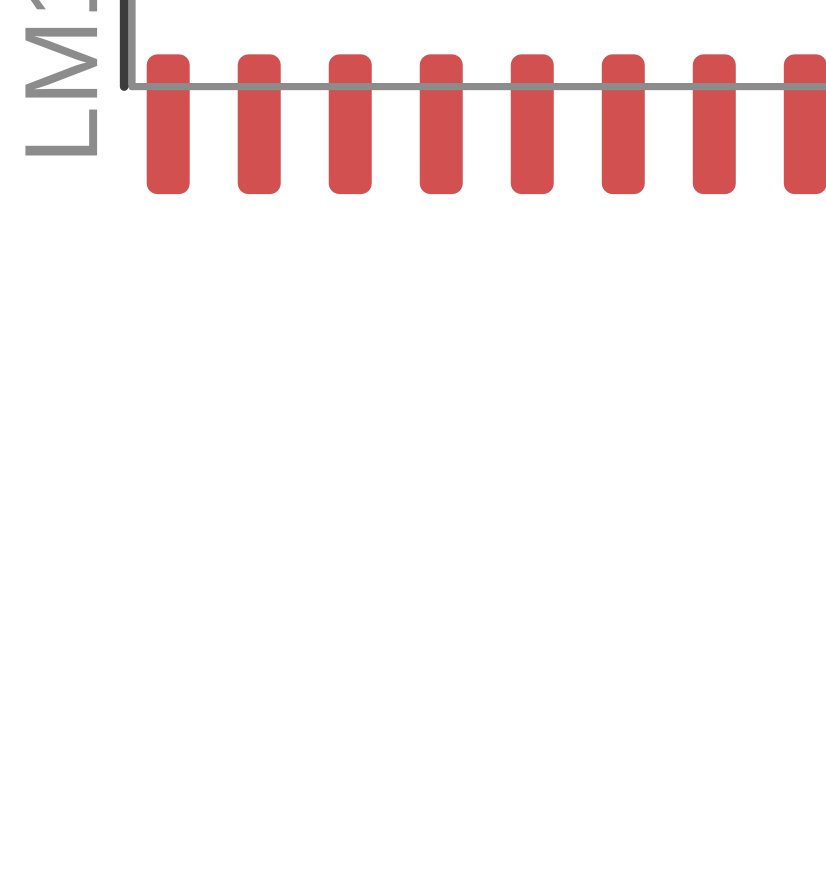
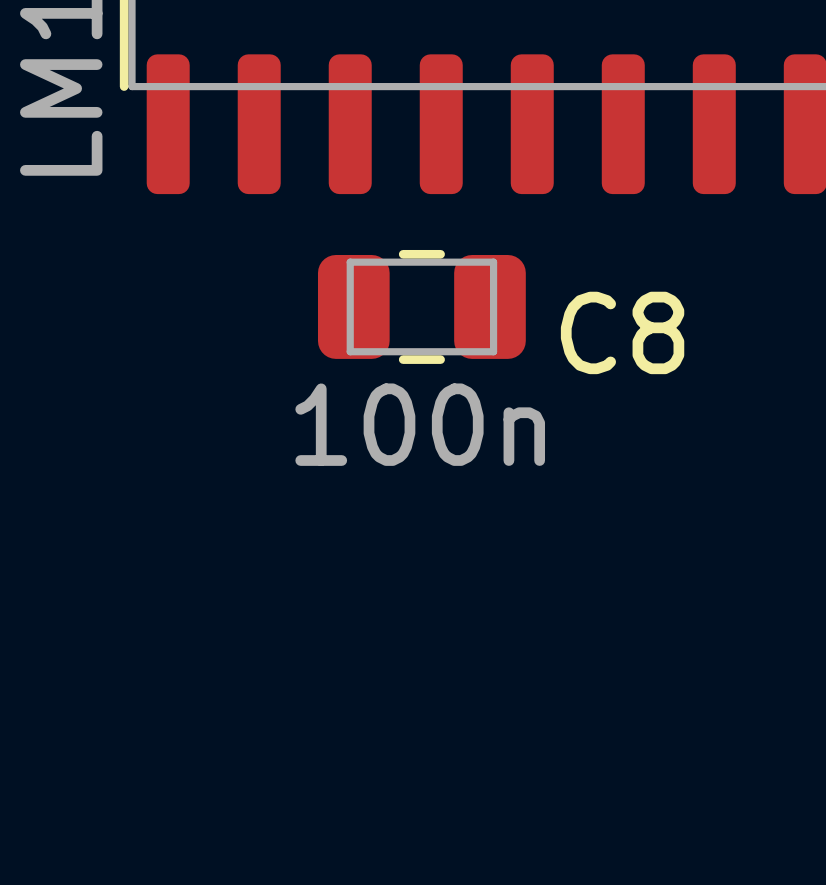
C8: none -> 100n (421, 306)

